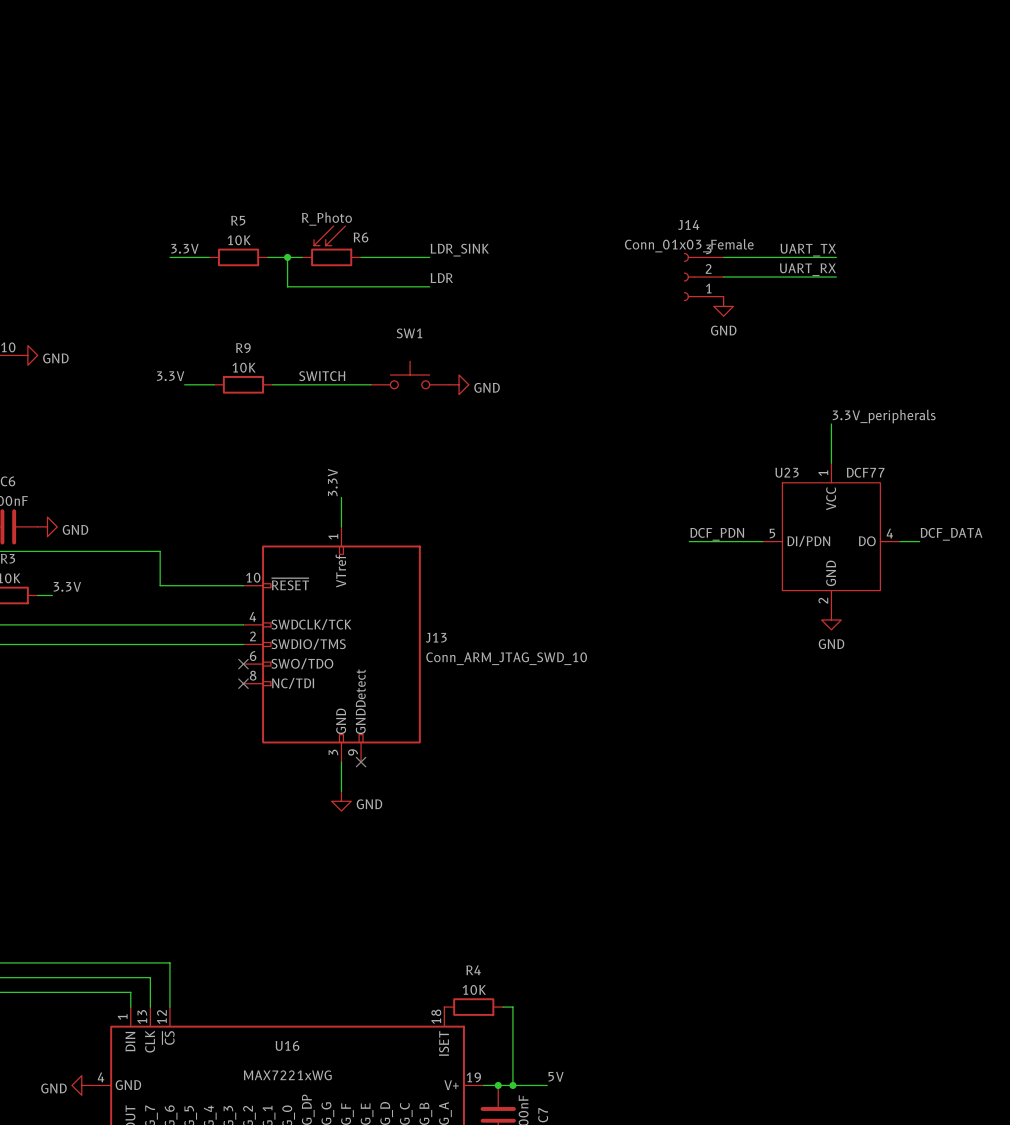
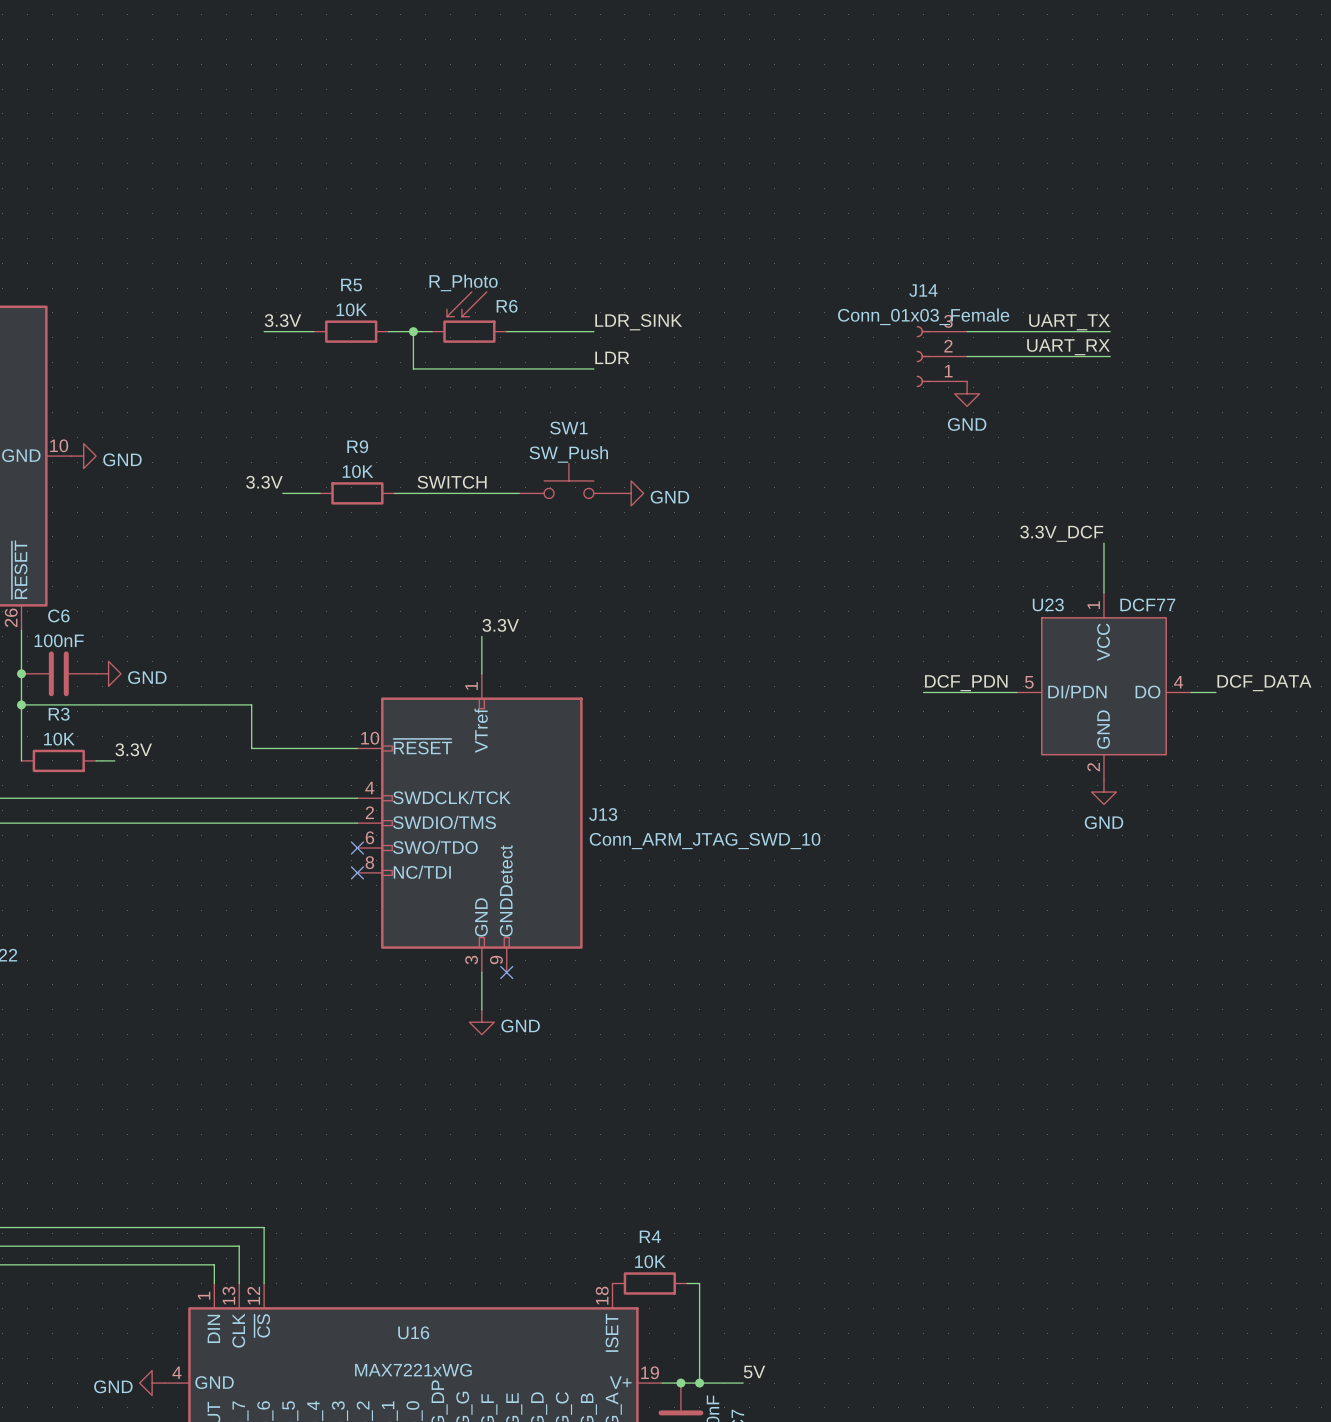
SW1 value: none -> SW_Push (568, 454)
label: 3.3V_peripherals (884, 416) -> 3.3V_DCF (1061, 533)
label rotation: 0° (332, 482) -> 90° clockwise (500, 625)

